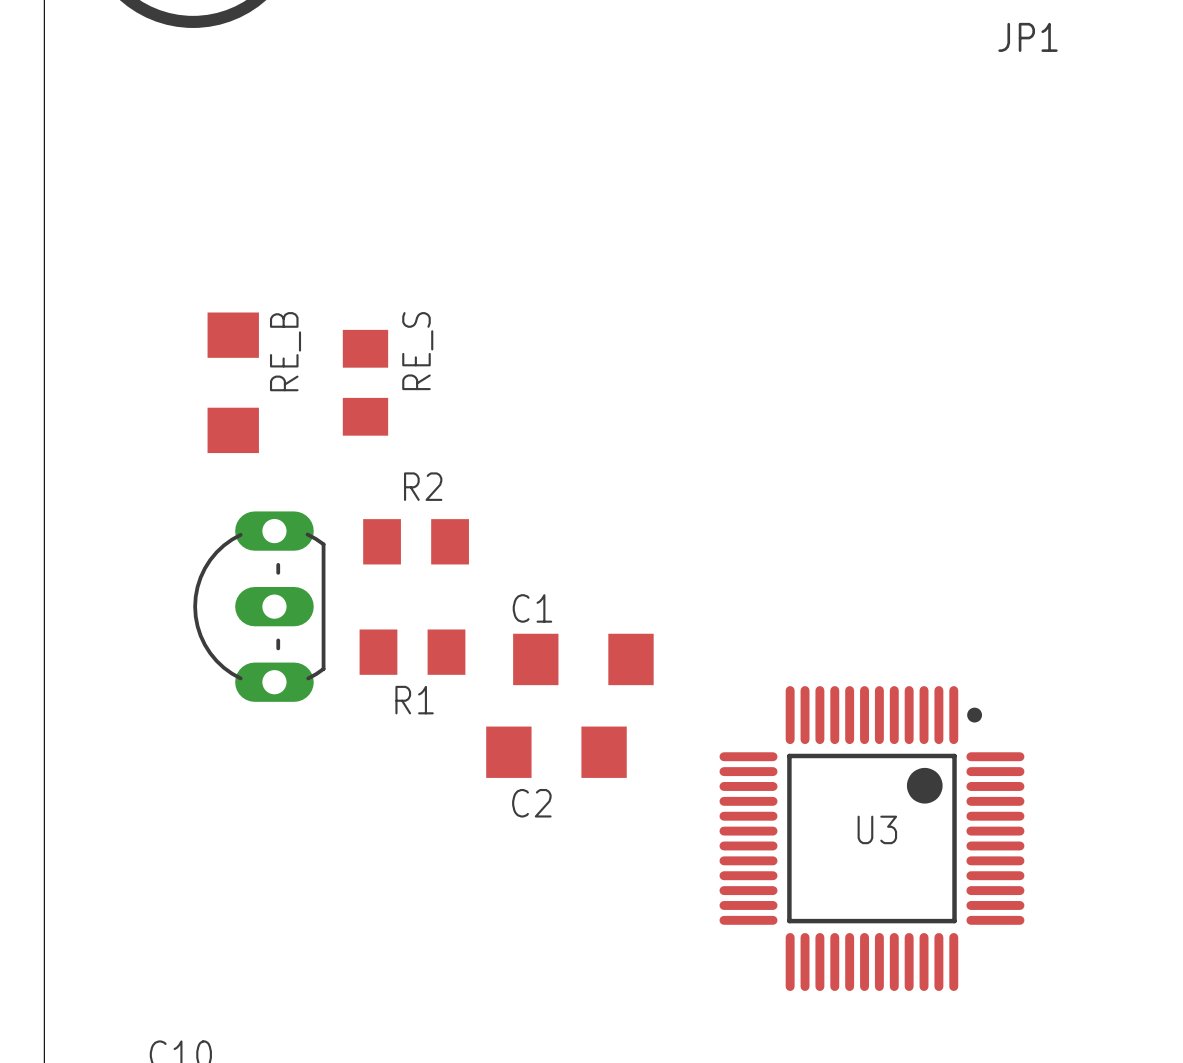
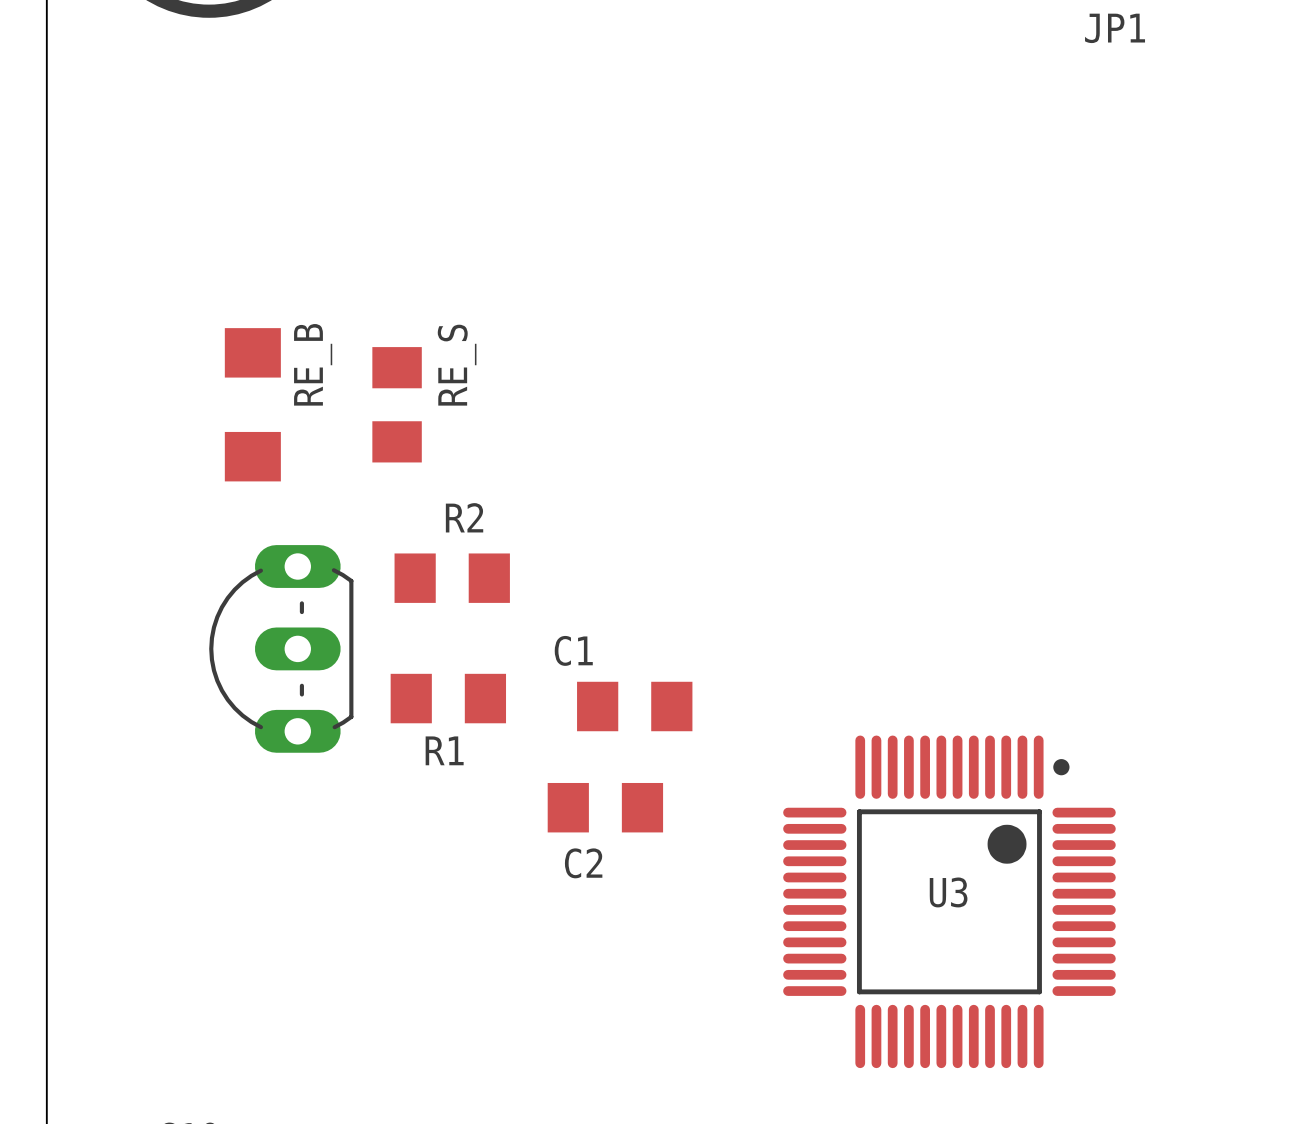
C1 footprint: [513, 633, 654, 686] -> [577, 681, 693, 732]
C2 footprint: [486, 726, 627, 778] -> [547, 782, 664, 833]

